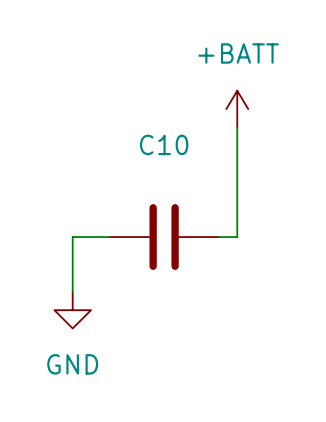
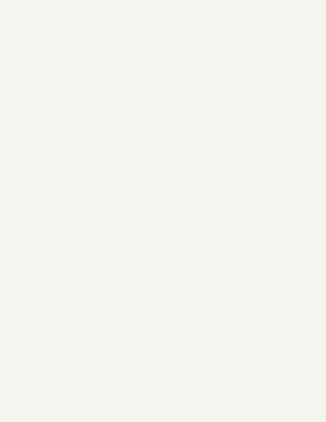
power symbol: +BATT (237, 109) -> none
wire: (237, 127) (237, 237) (218, 237) -> none
wire: (109, 237) (72, 237) (72, 291) -> none
C10: (164, 237) -> none
power symbol: GND (72, 310) -> none

